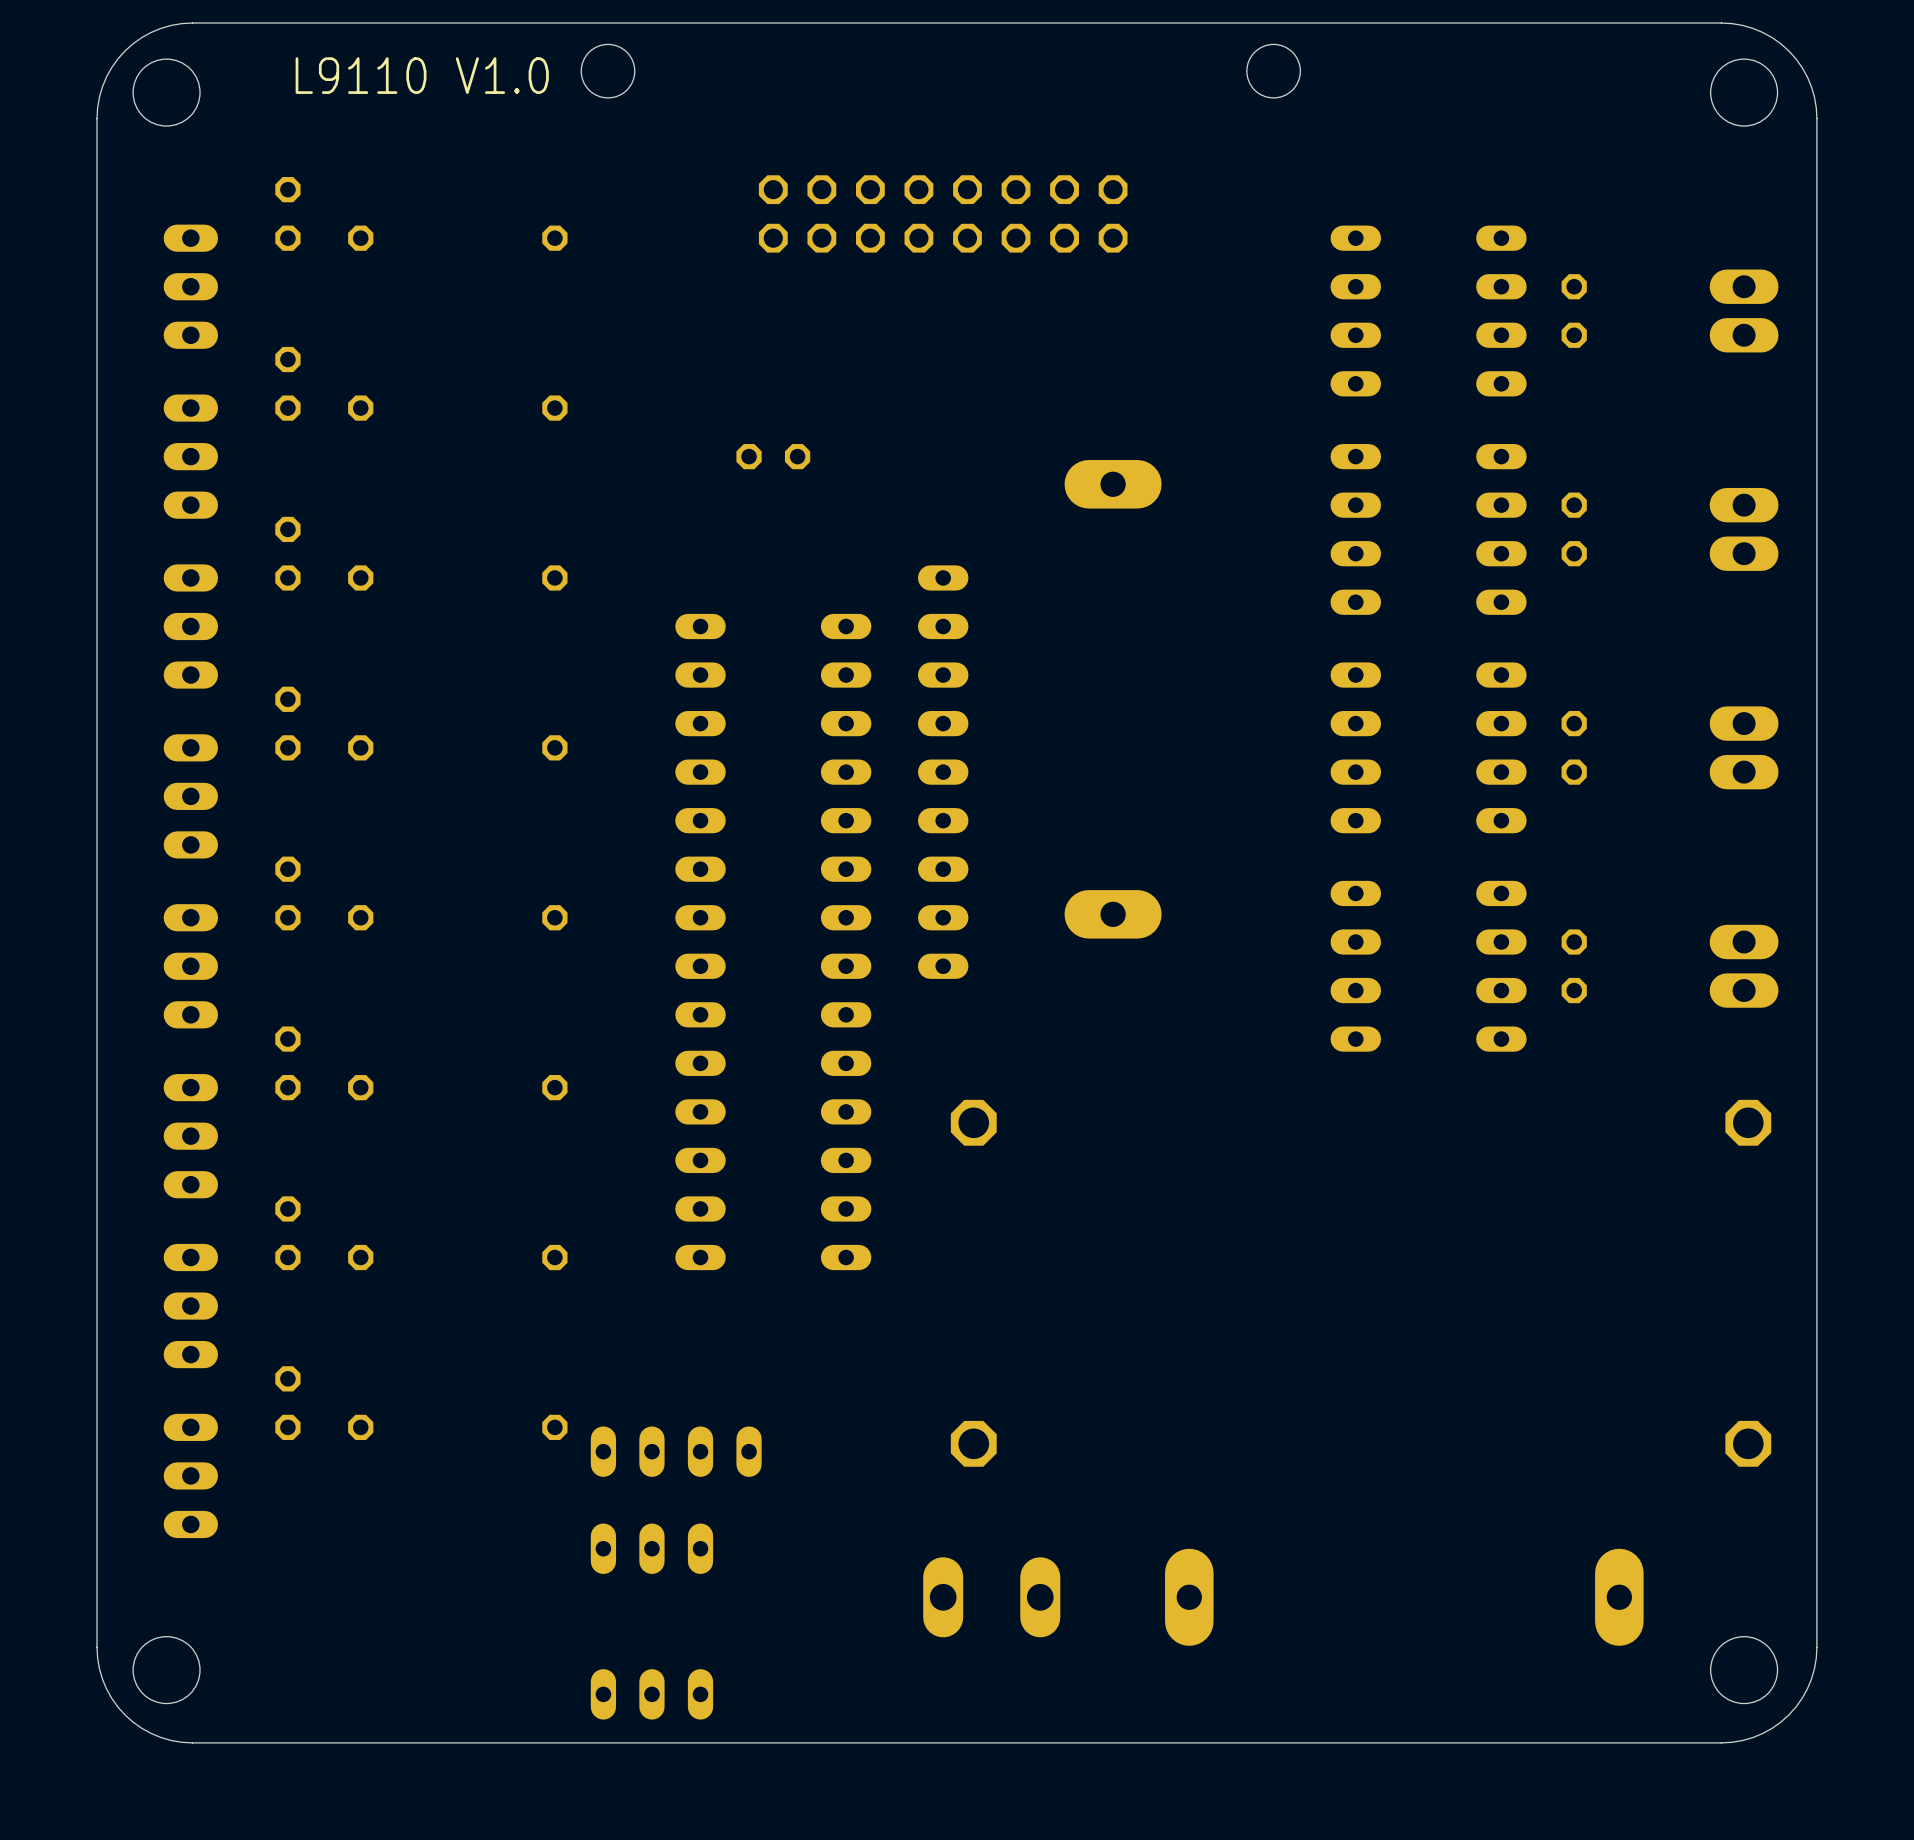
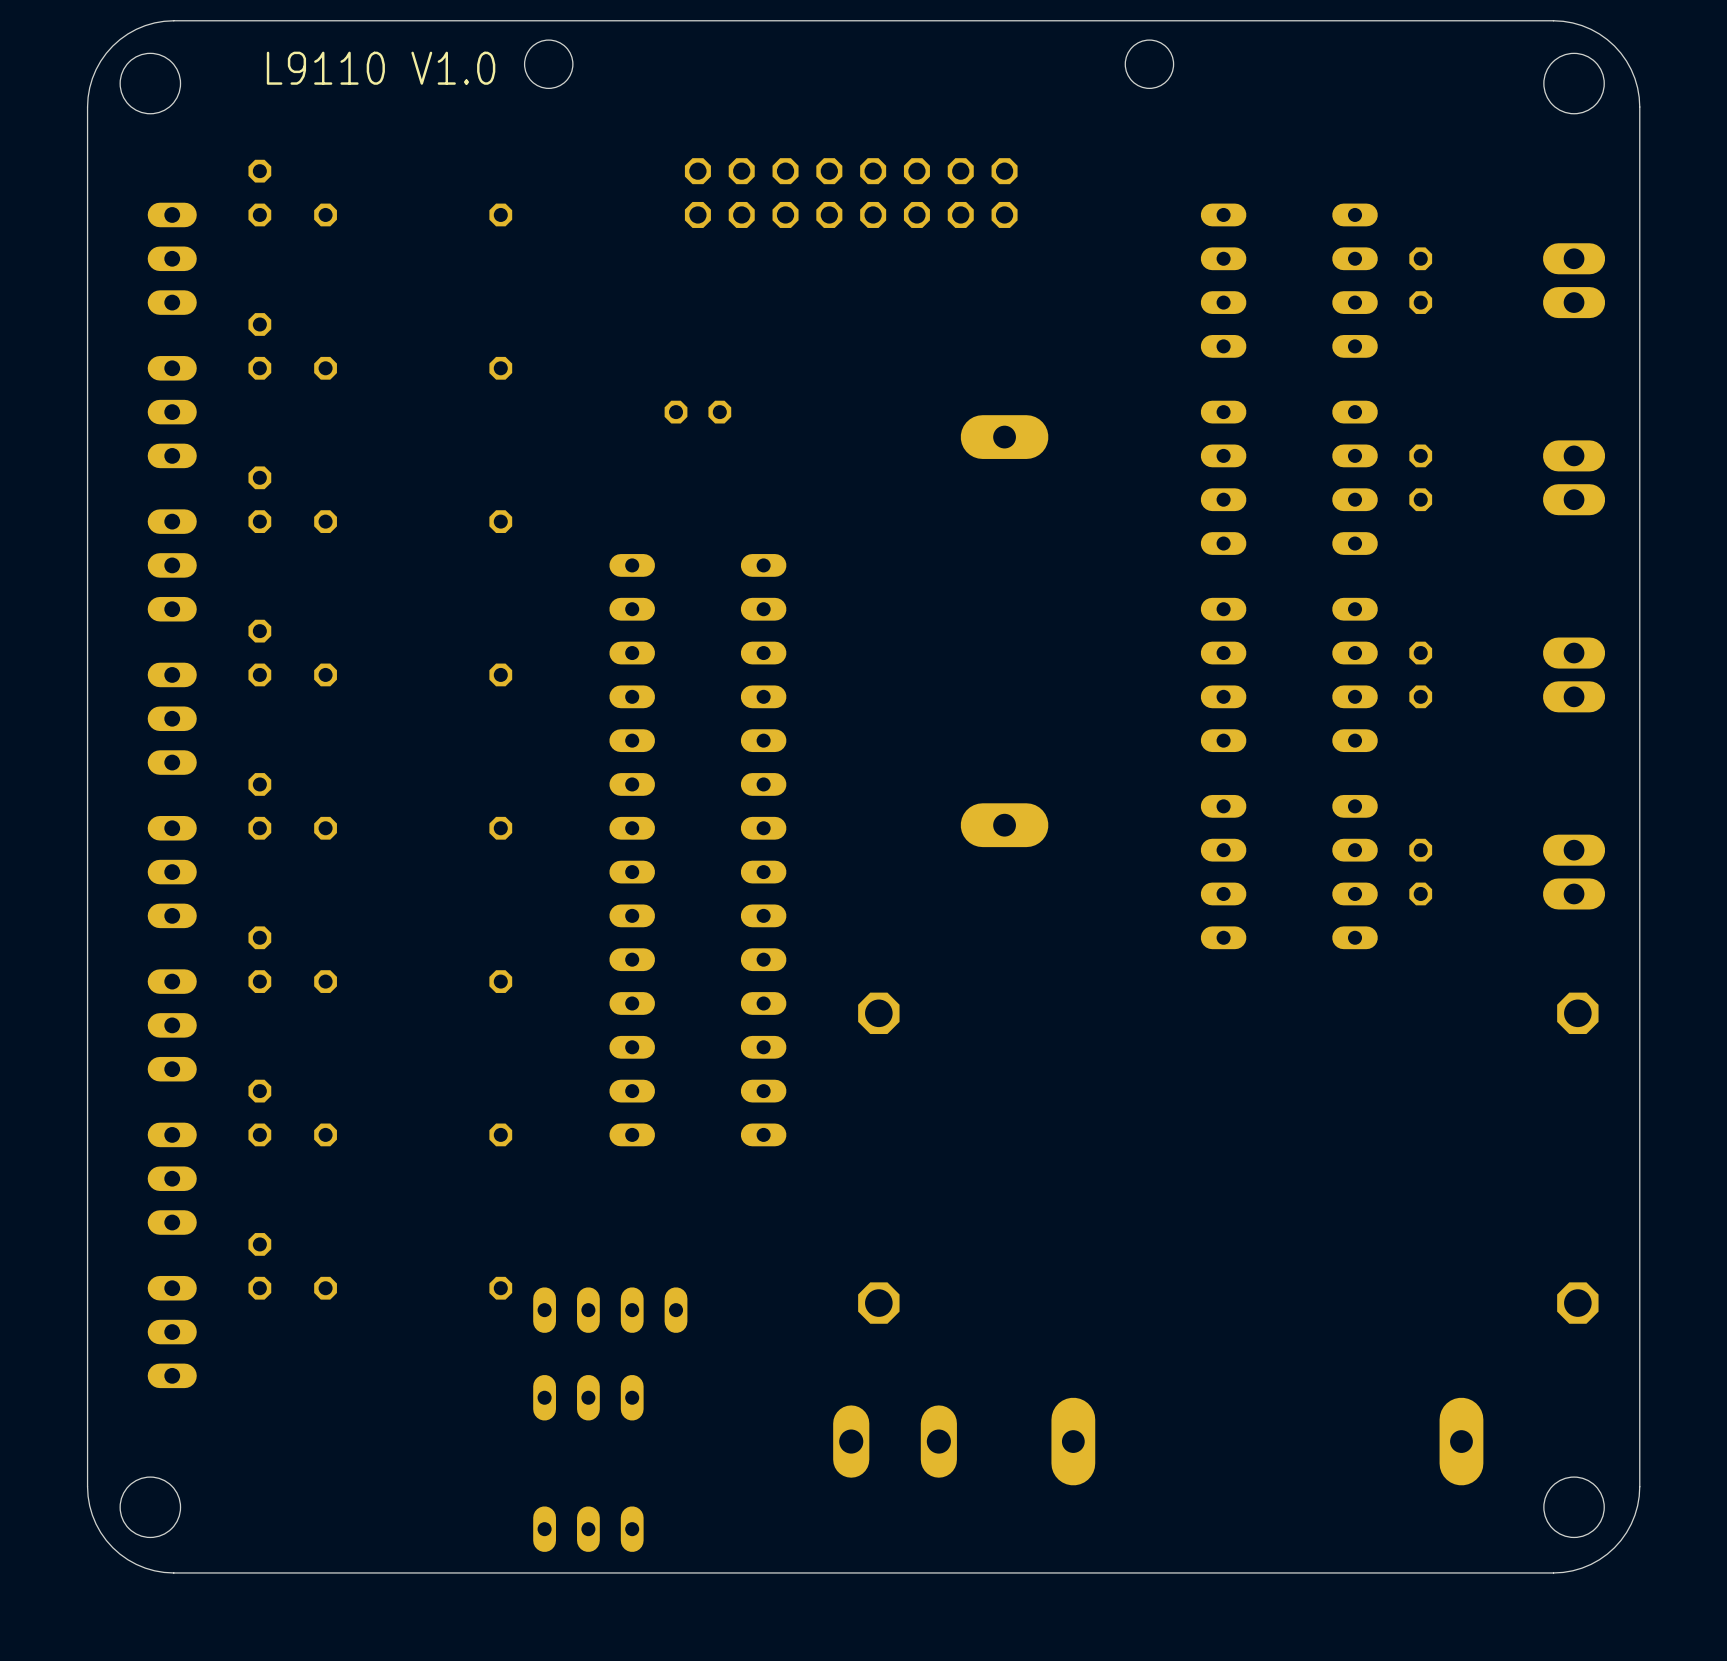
part: (943, 772) -> none

